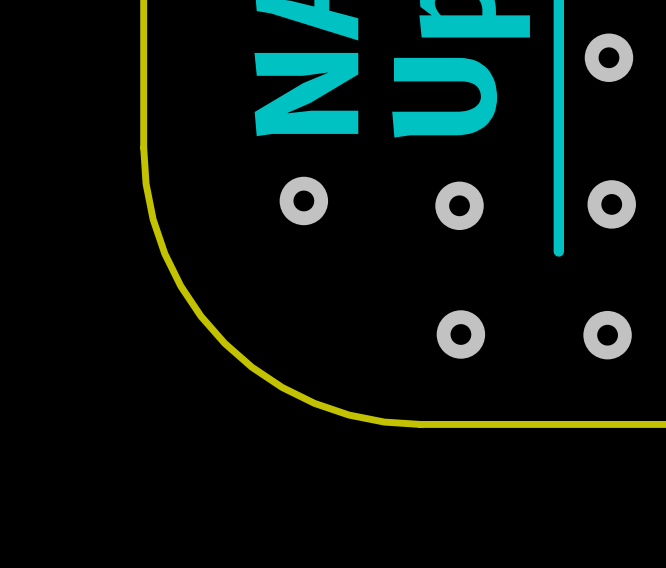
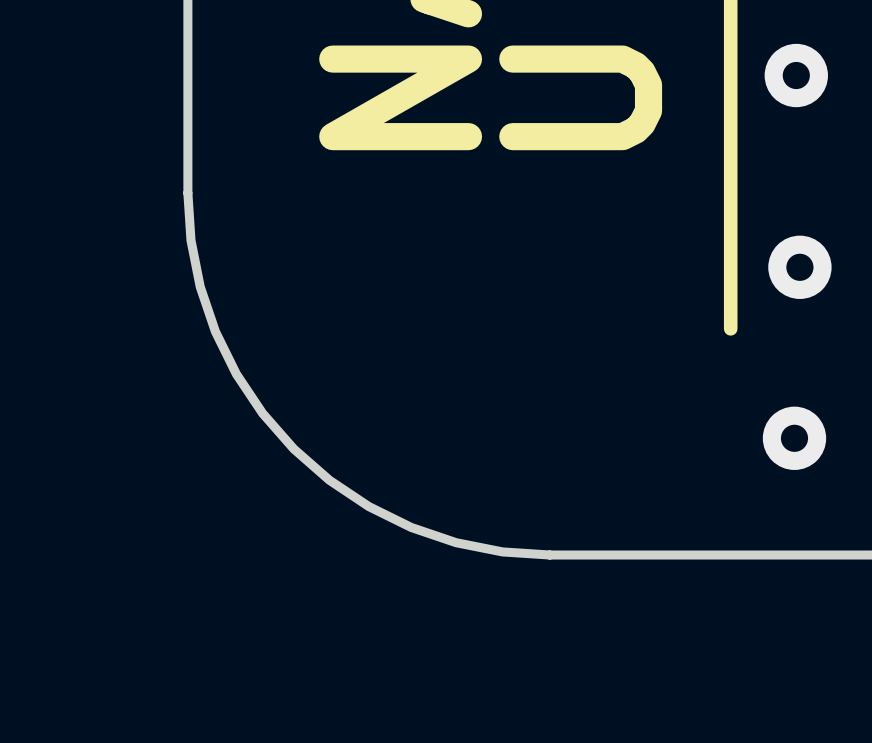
via: (303, 200) -> none
via: (459, 205) -> none
via: (460, 334) -> none

